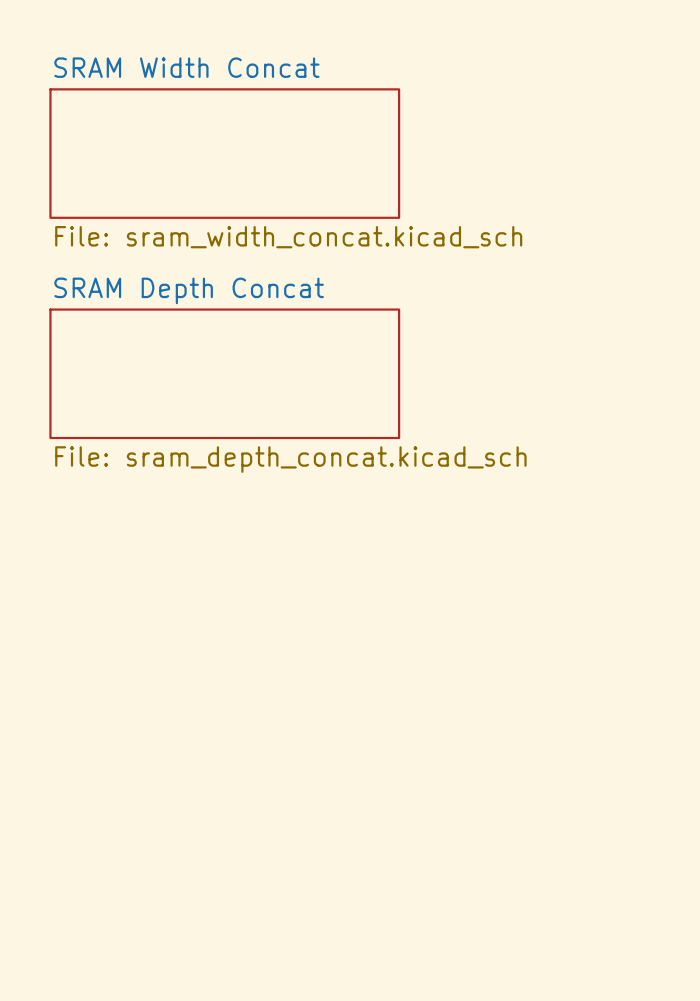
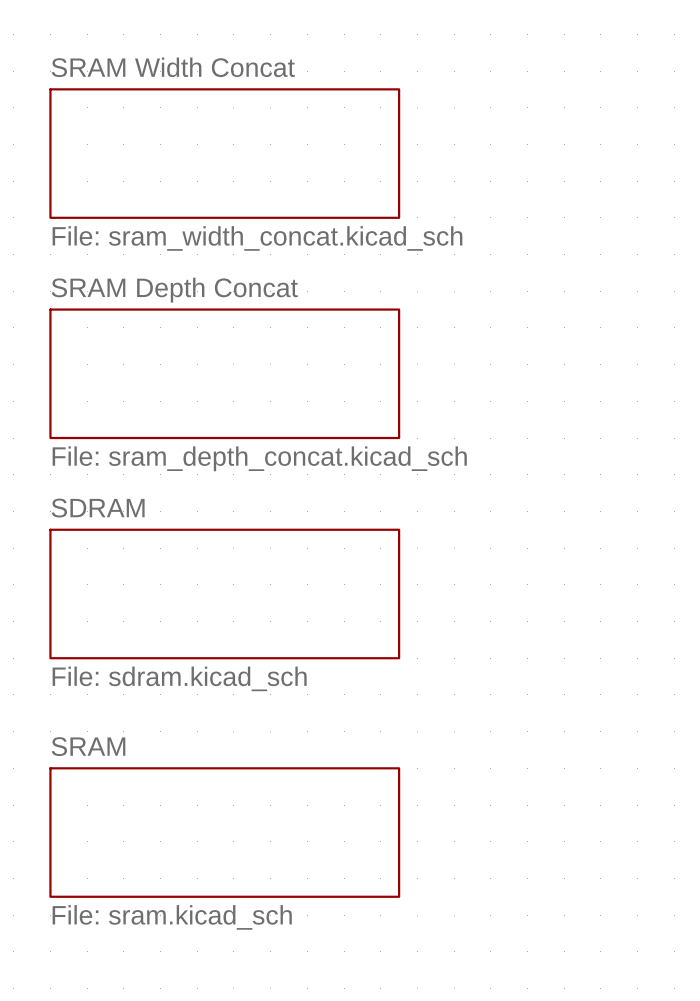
sheet SDRAM: none -> File: sdram.kicad_sch (224, 593)
sheet SRAM: none -> File: sram.kicad_sch (224, 832)

